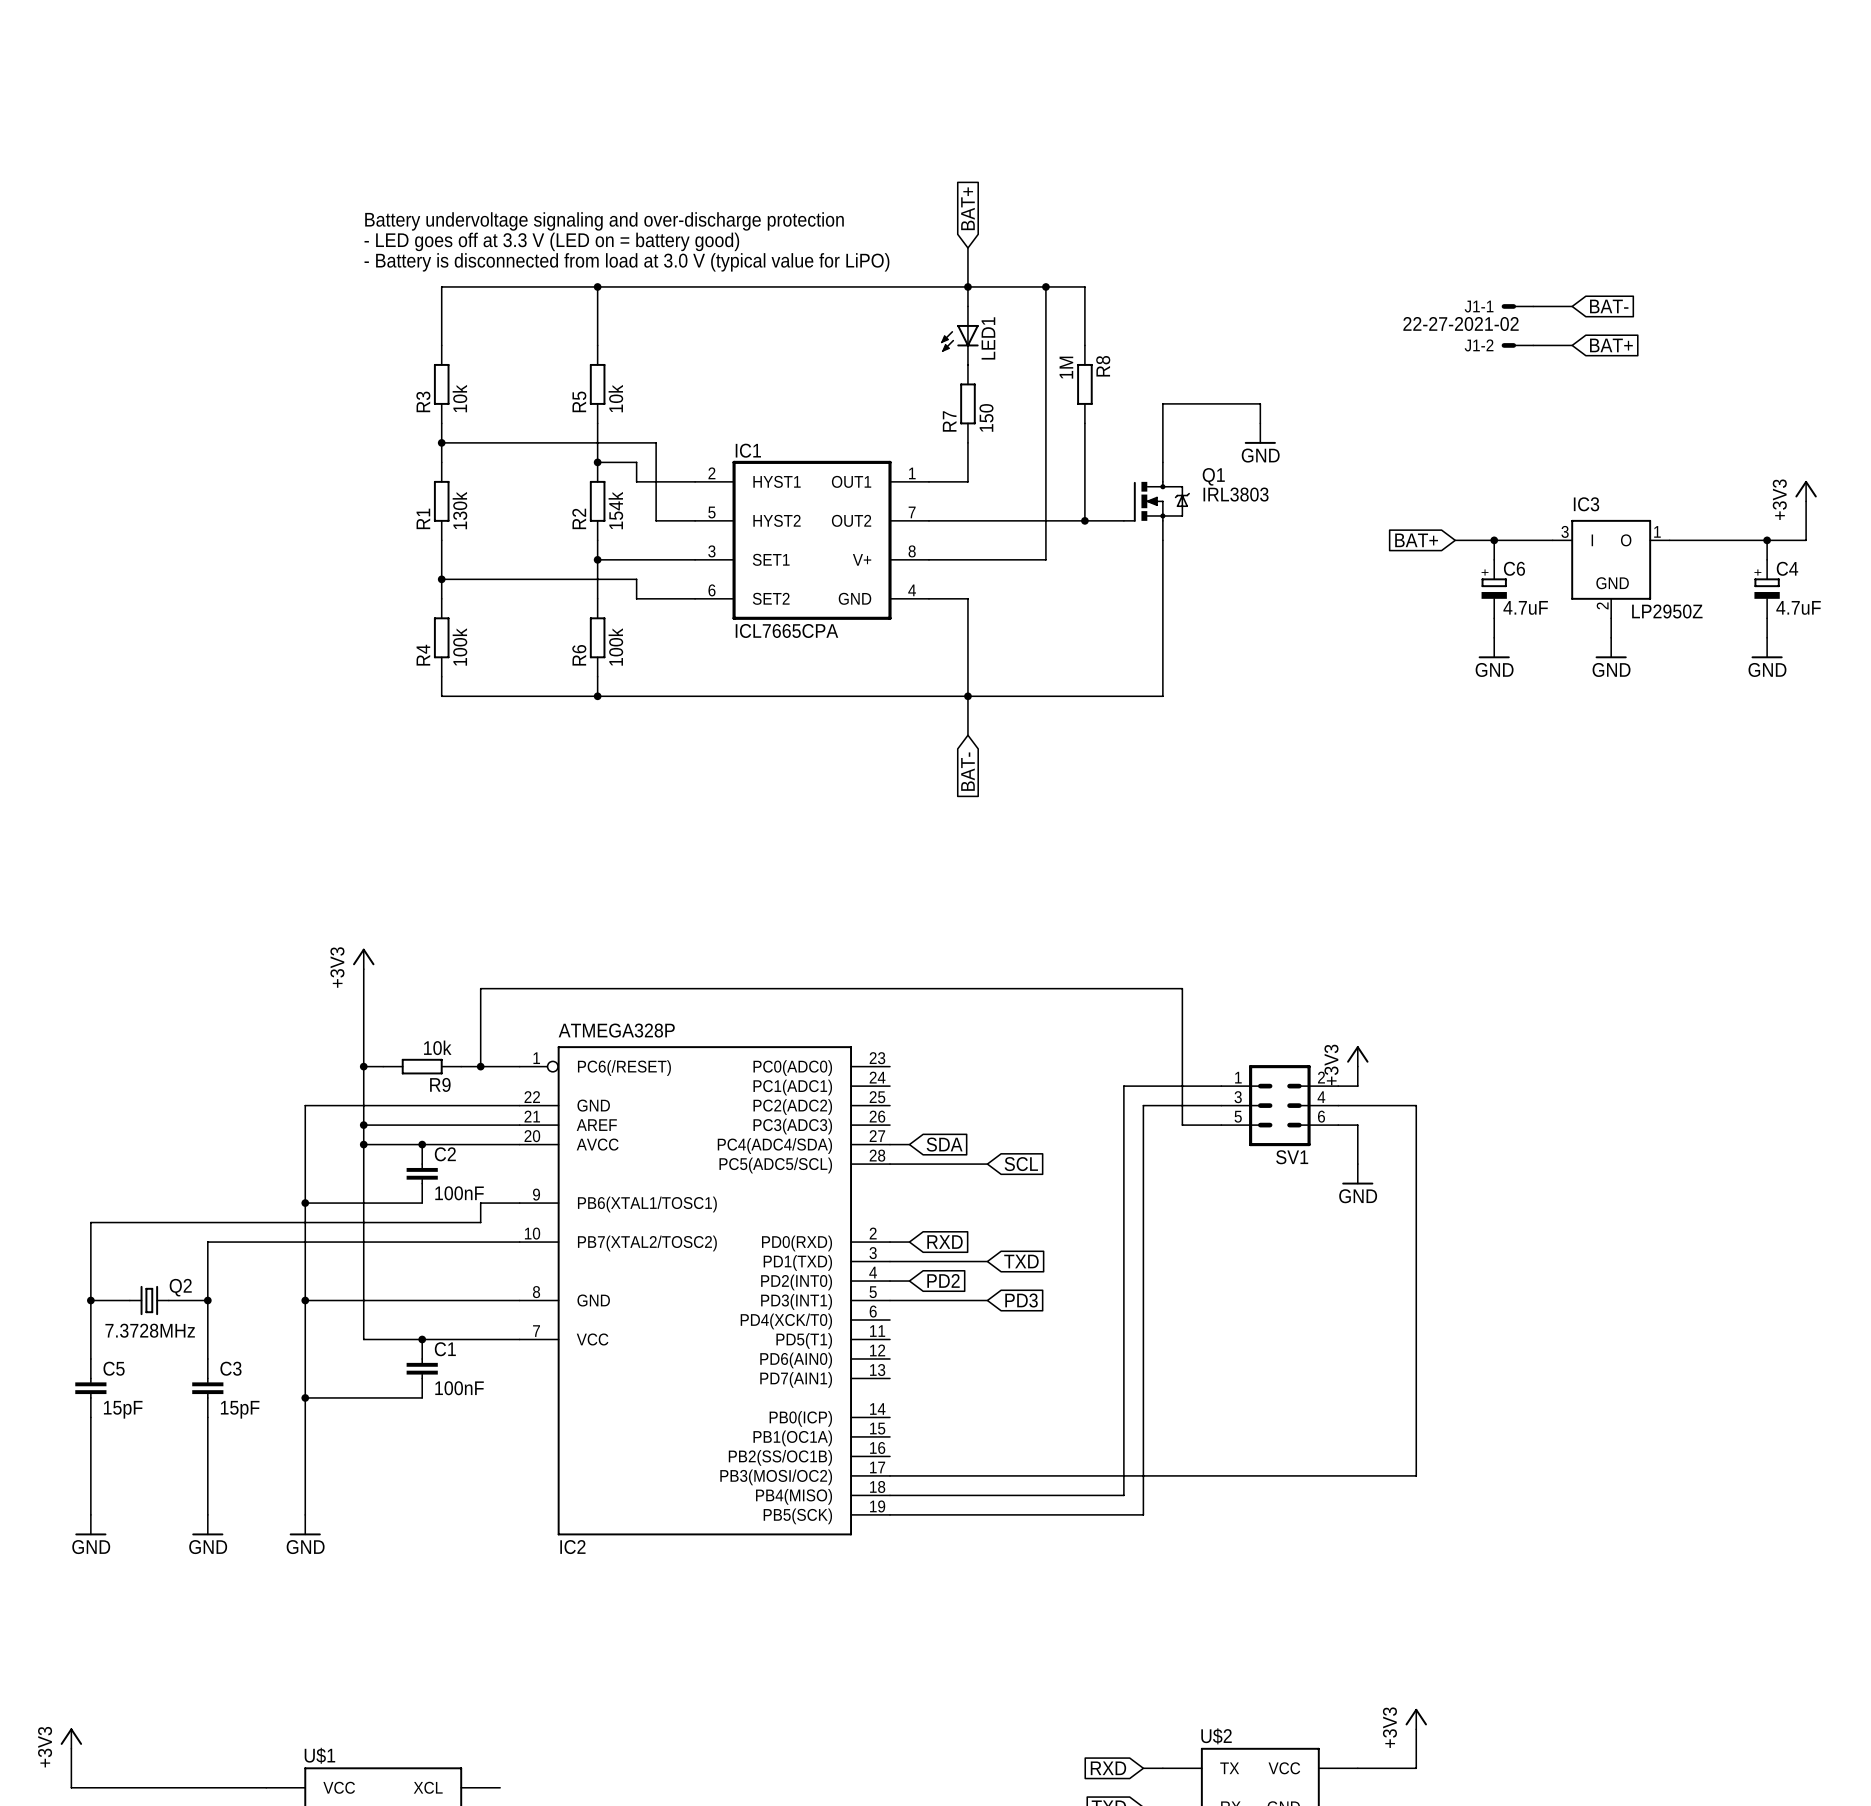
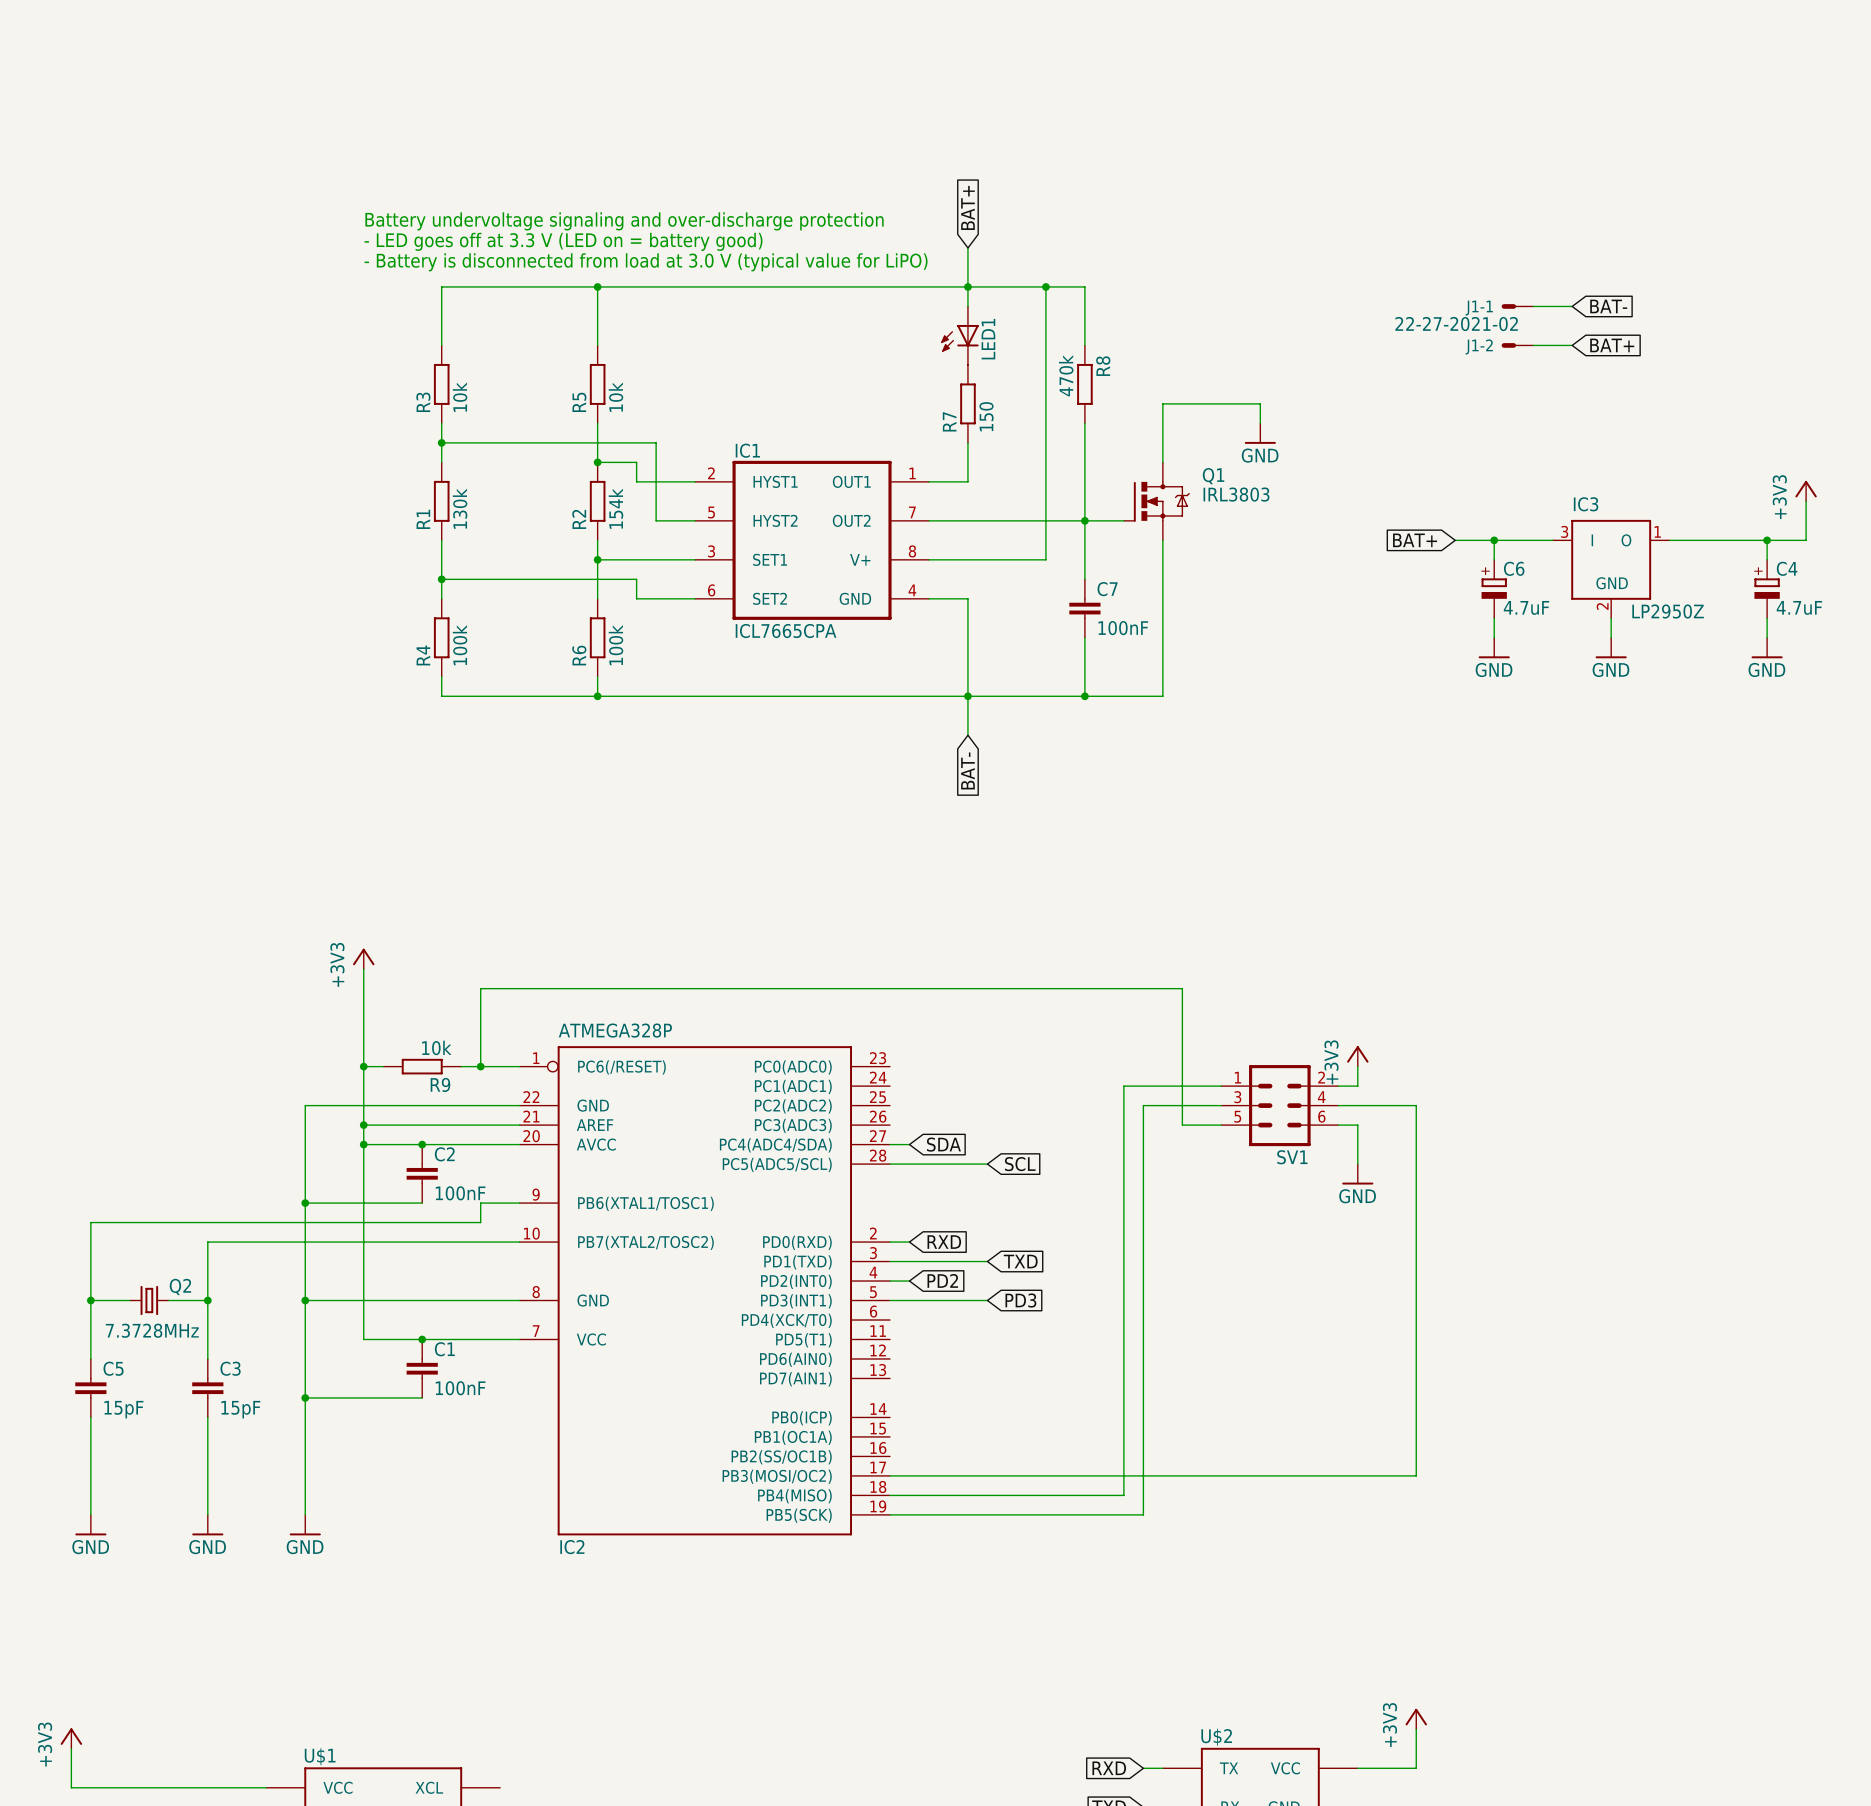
R8 value: 1M (1066, 367) -> 470k (1066, 375)
wire: none -> (1084, 520) (1084, 579)
C7: none -> 100nF (1084, 608)
wire: none -> (1084, 637) (1084, 696)
junction: none -> (1084, 696)

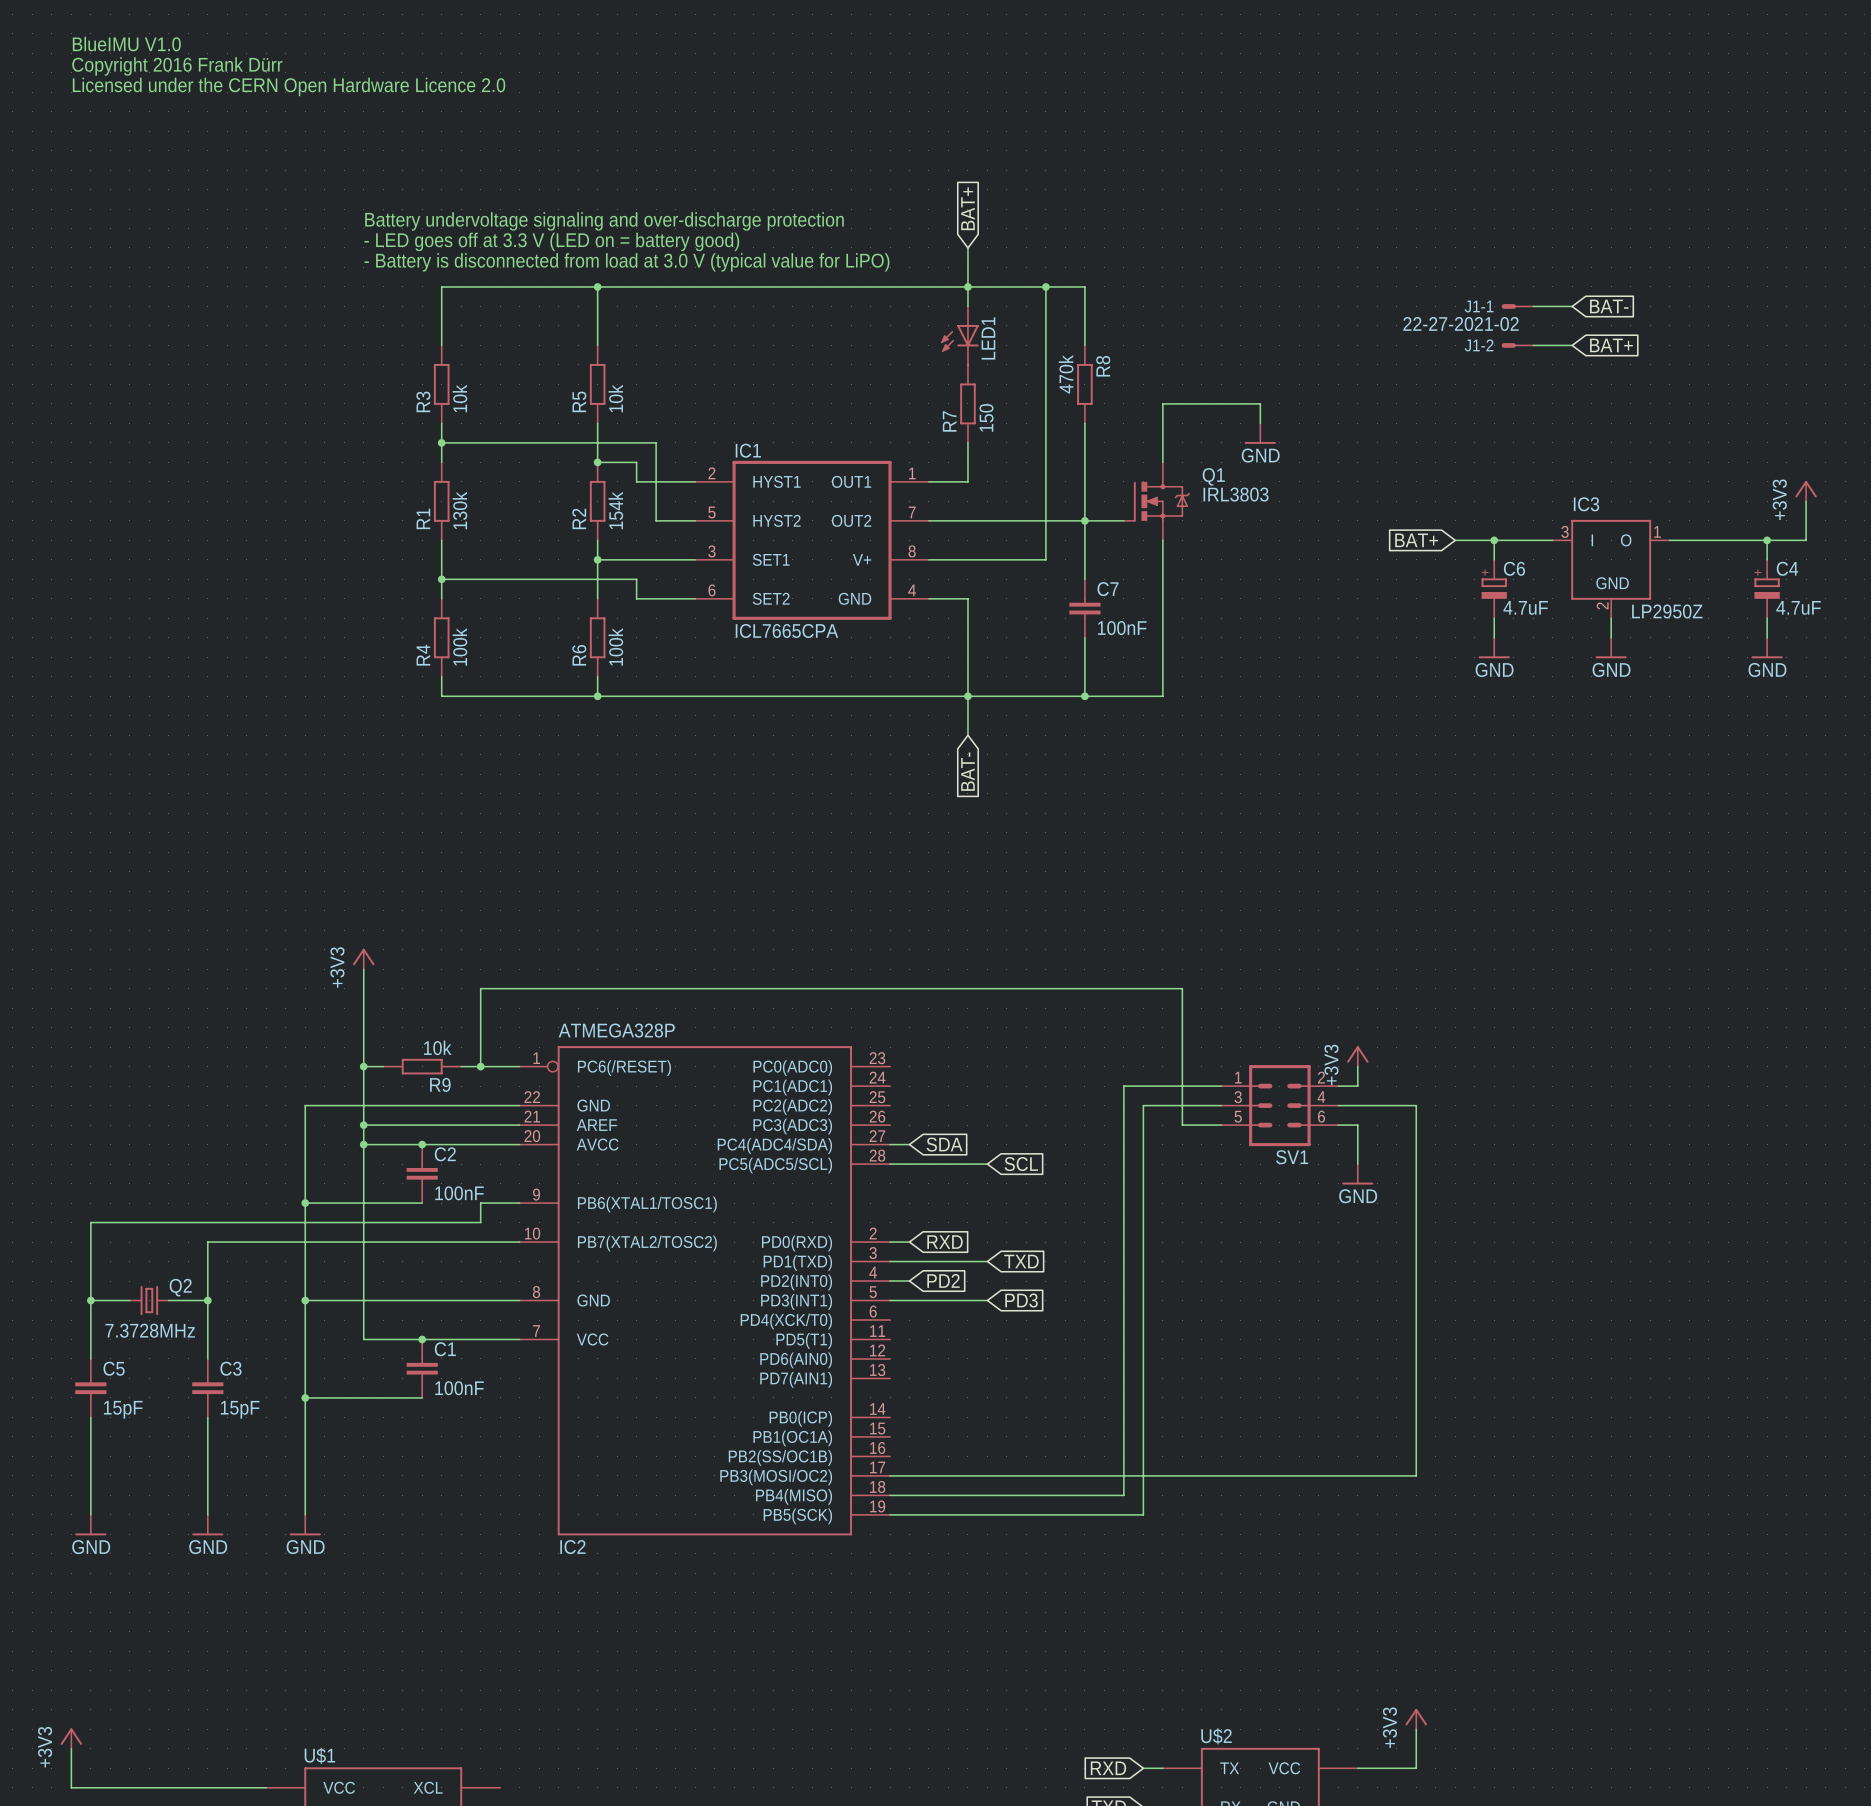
text: none -> BlueIMU V1.0 (126, 44)
text: none -> Copyright 2016 Frank Dürr (177, 66)
text: none -> Licensed under the CERN Open Hardware Licence 2.0 (289, 86)

